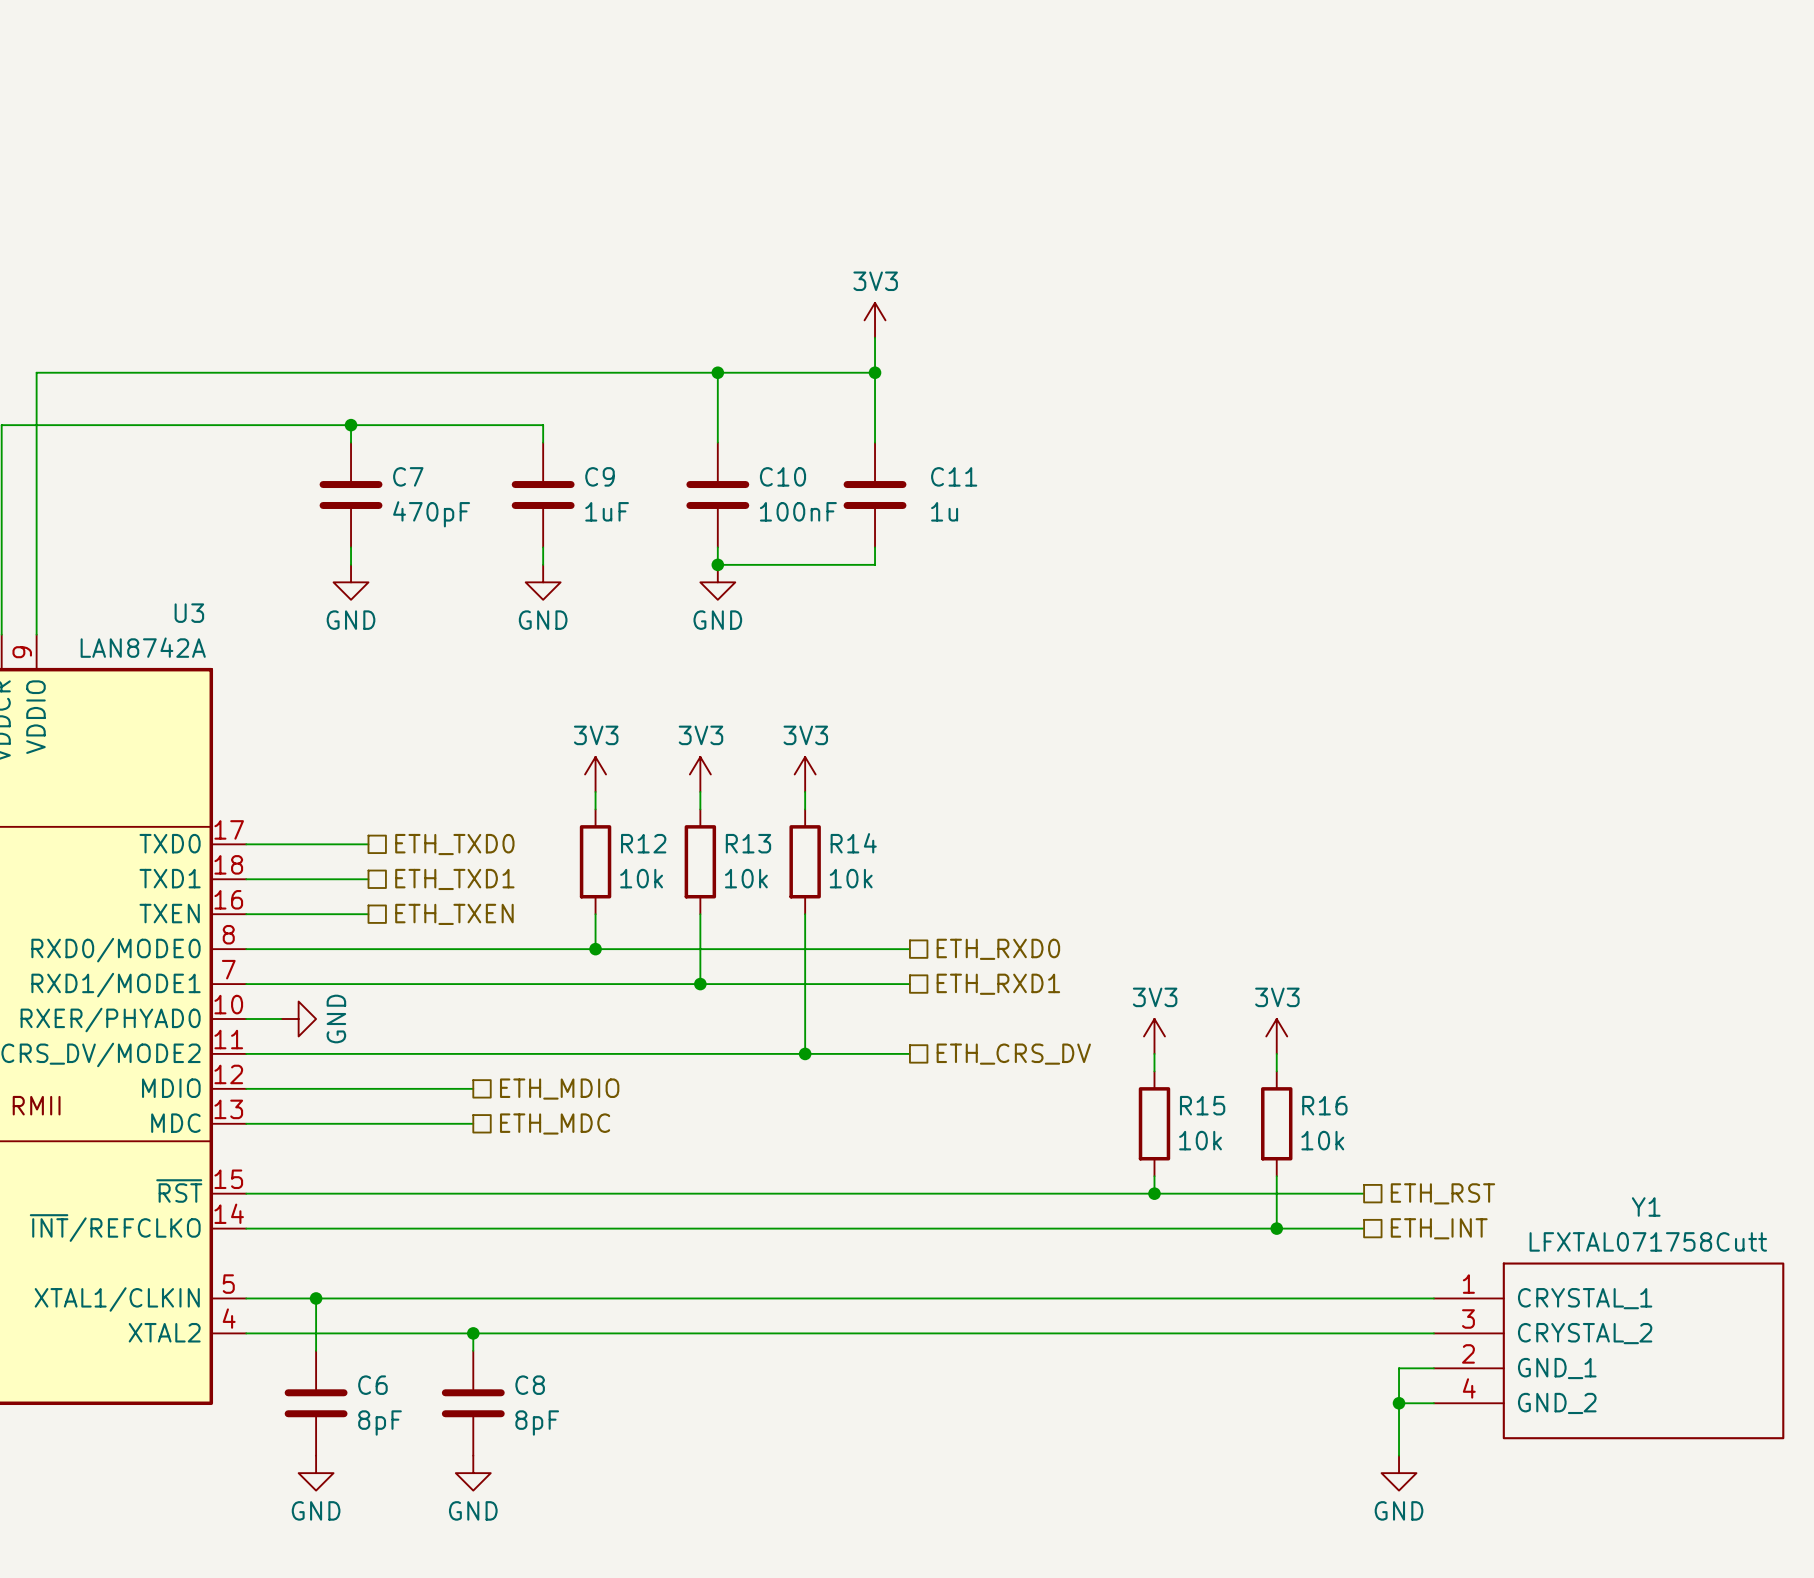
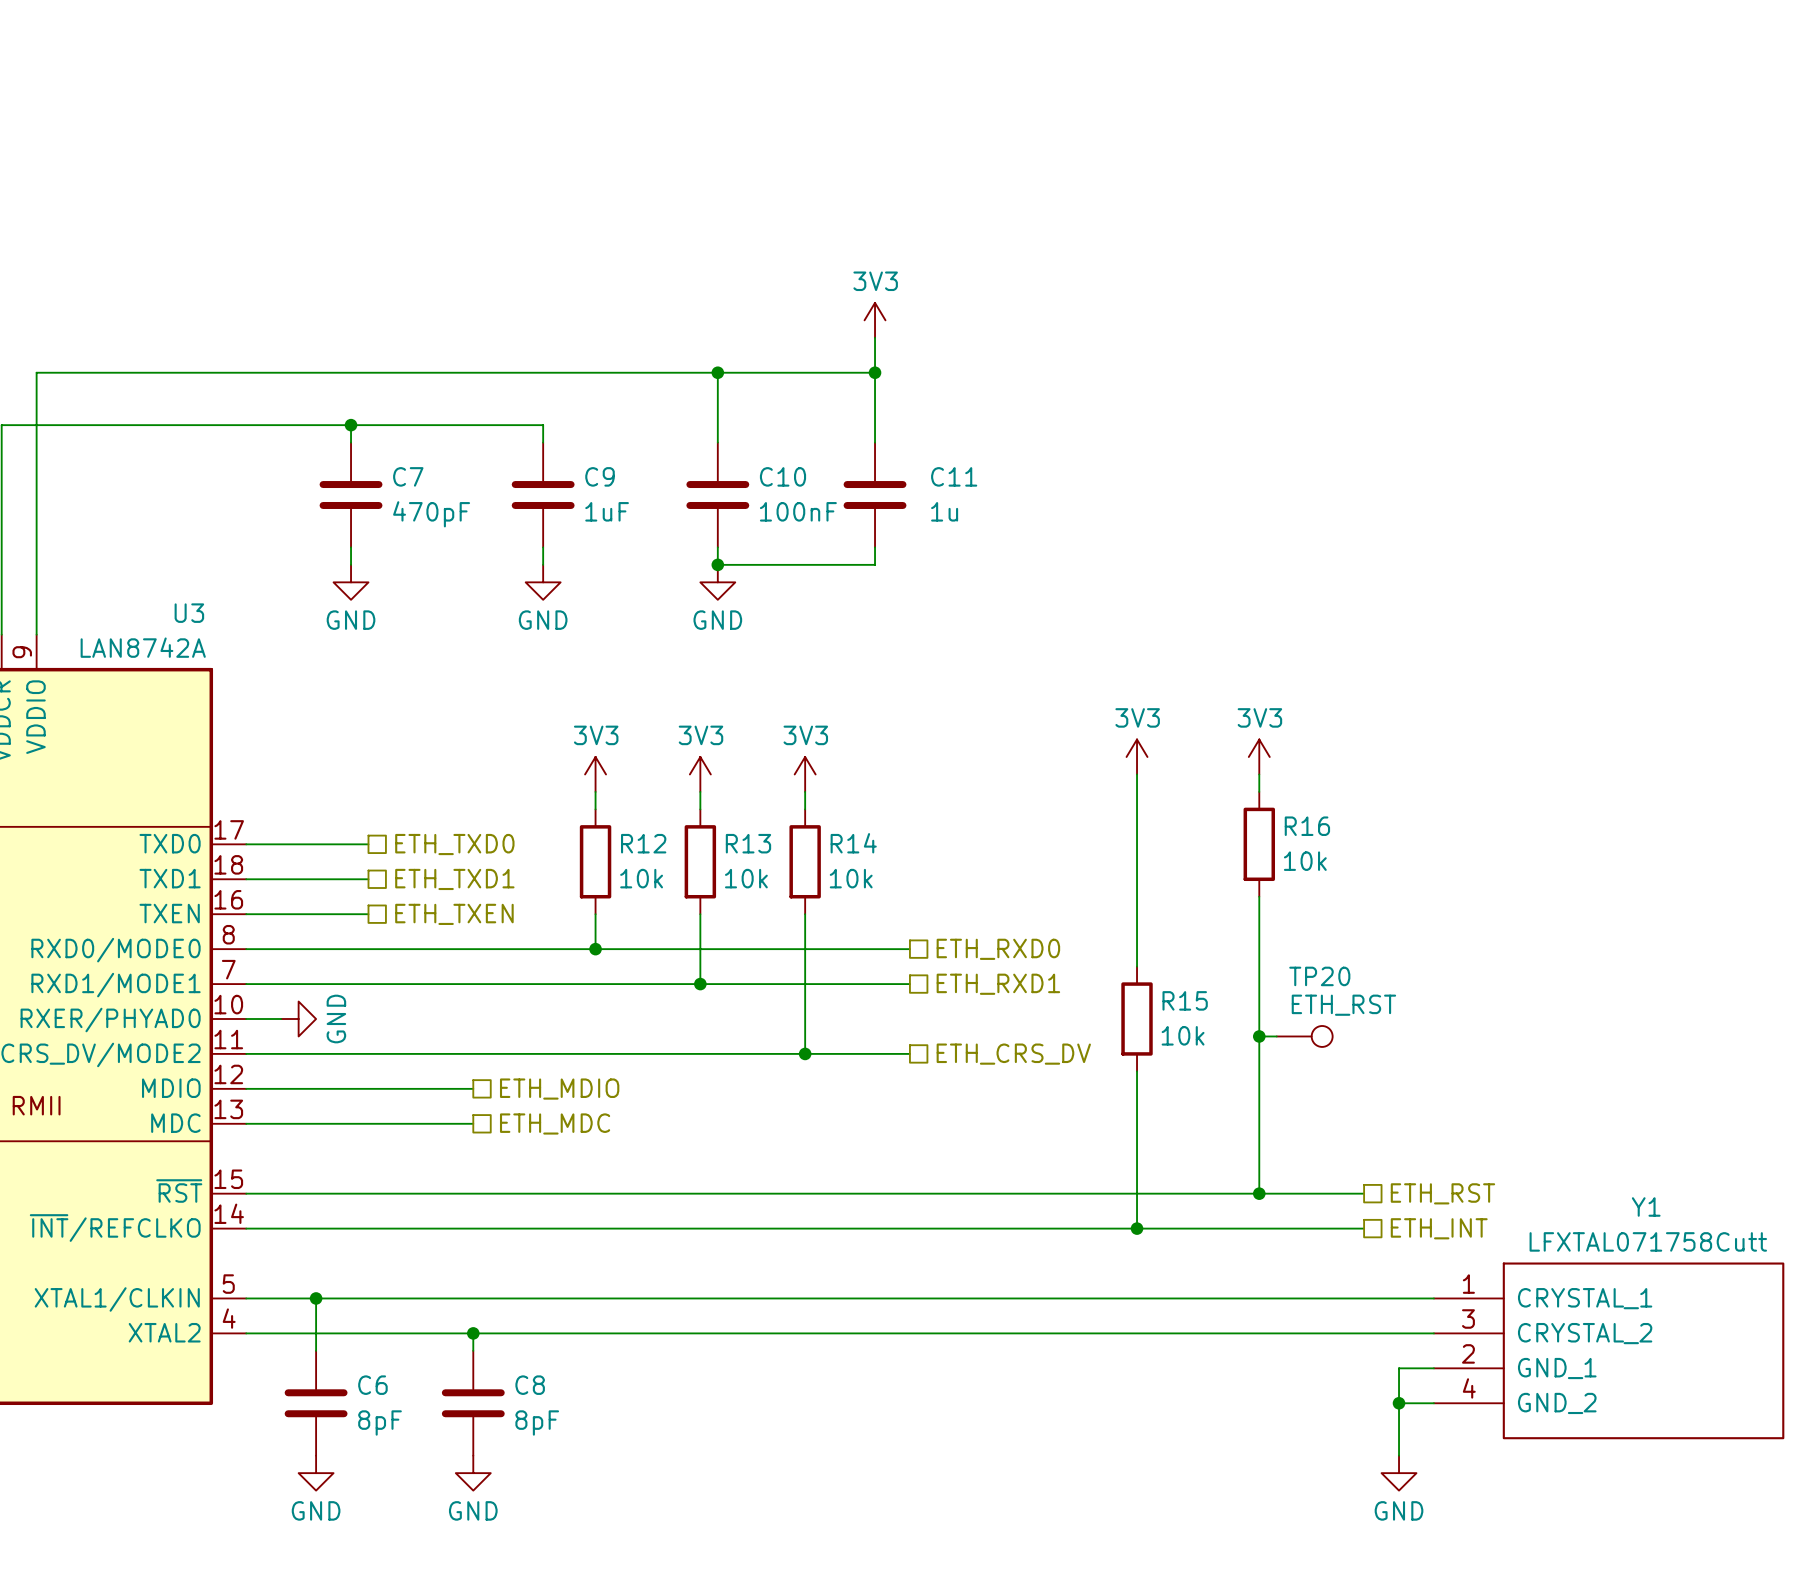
power symbol: none -> 3V3 (1137, 757)
power symbol: none -> 3V3 (1259, 757)
wire: none -> (1137, 774) (1137, 966)
wire: none -> (1259, 896) (1259, 1193)
power symbol: 3V3 (1154, 1036) -> none
wire: none -> (1259, 1036) (1276, 1036)
junction: none -> (1259, 1036)
power symbol: 3V3 (1276, 1036) -> none
TP20: none -> ETH_RST (1304, 1036)
wire: (1154, 1053) (1154, 1071) -> none
wire: (1276, 1053) (1276, 1071) -> (1259, 774) (1259, 791)
wire: none -> (1137, 1071) (1137, 1228)
R15 position: (1154, 1123) -> (1137, 1019)
R16 position: (1276, 1123) -> (1259, 844)
wire: (1154, 1176) (1154, 1193) -> none
wire: (1276, 1176) (1276, 1228) -> none
junction position: (1154, 1193) -> (1137, 1228)
junction position: (1276, 1228) -> (1259, 1193)

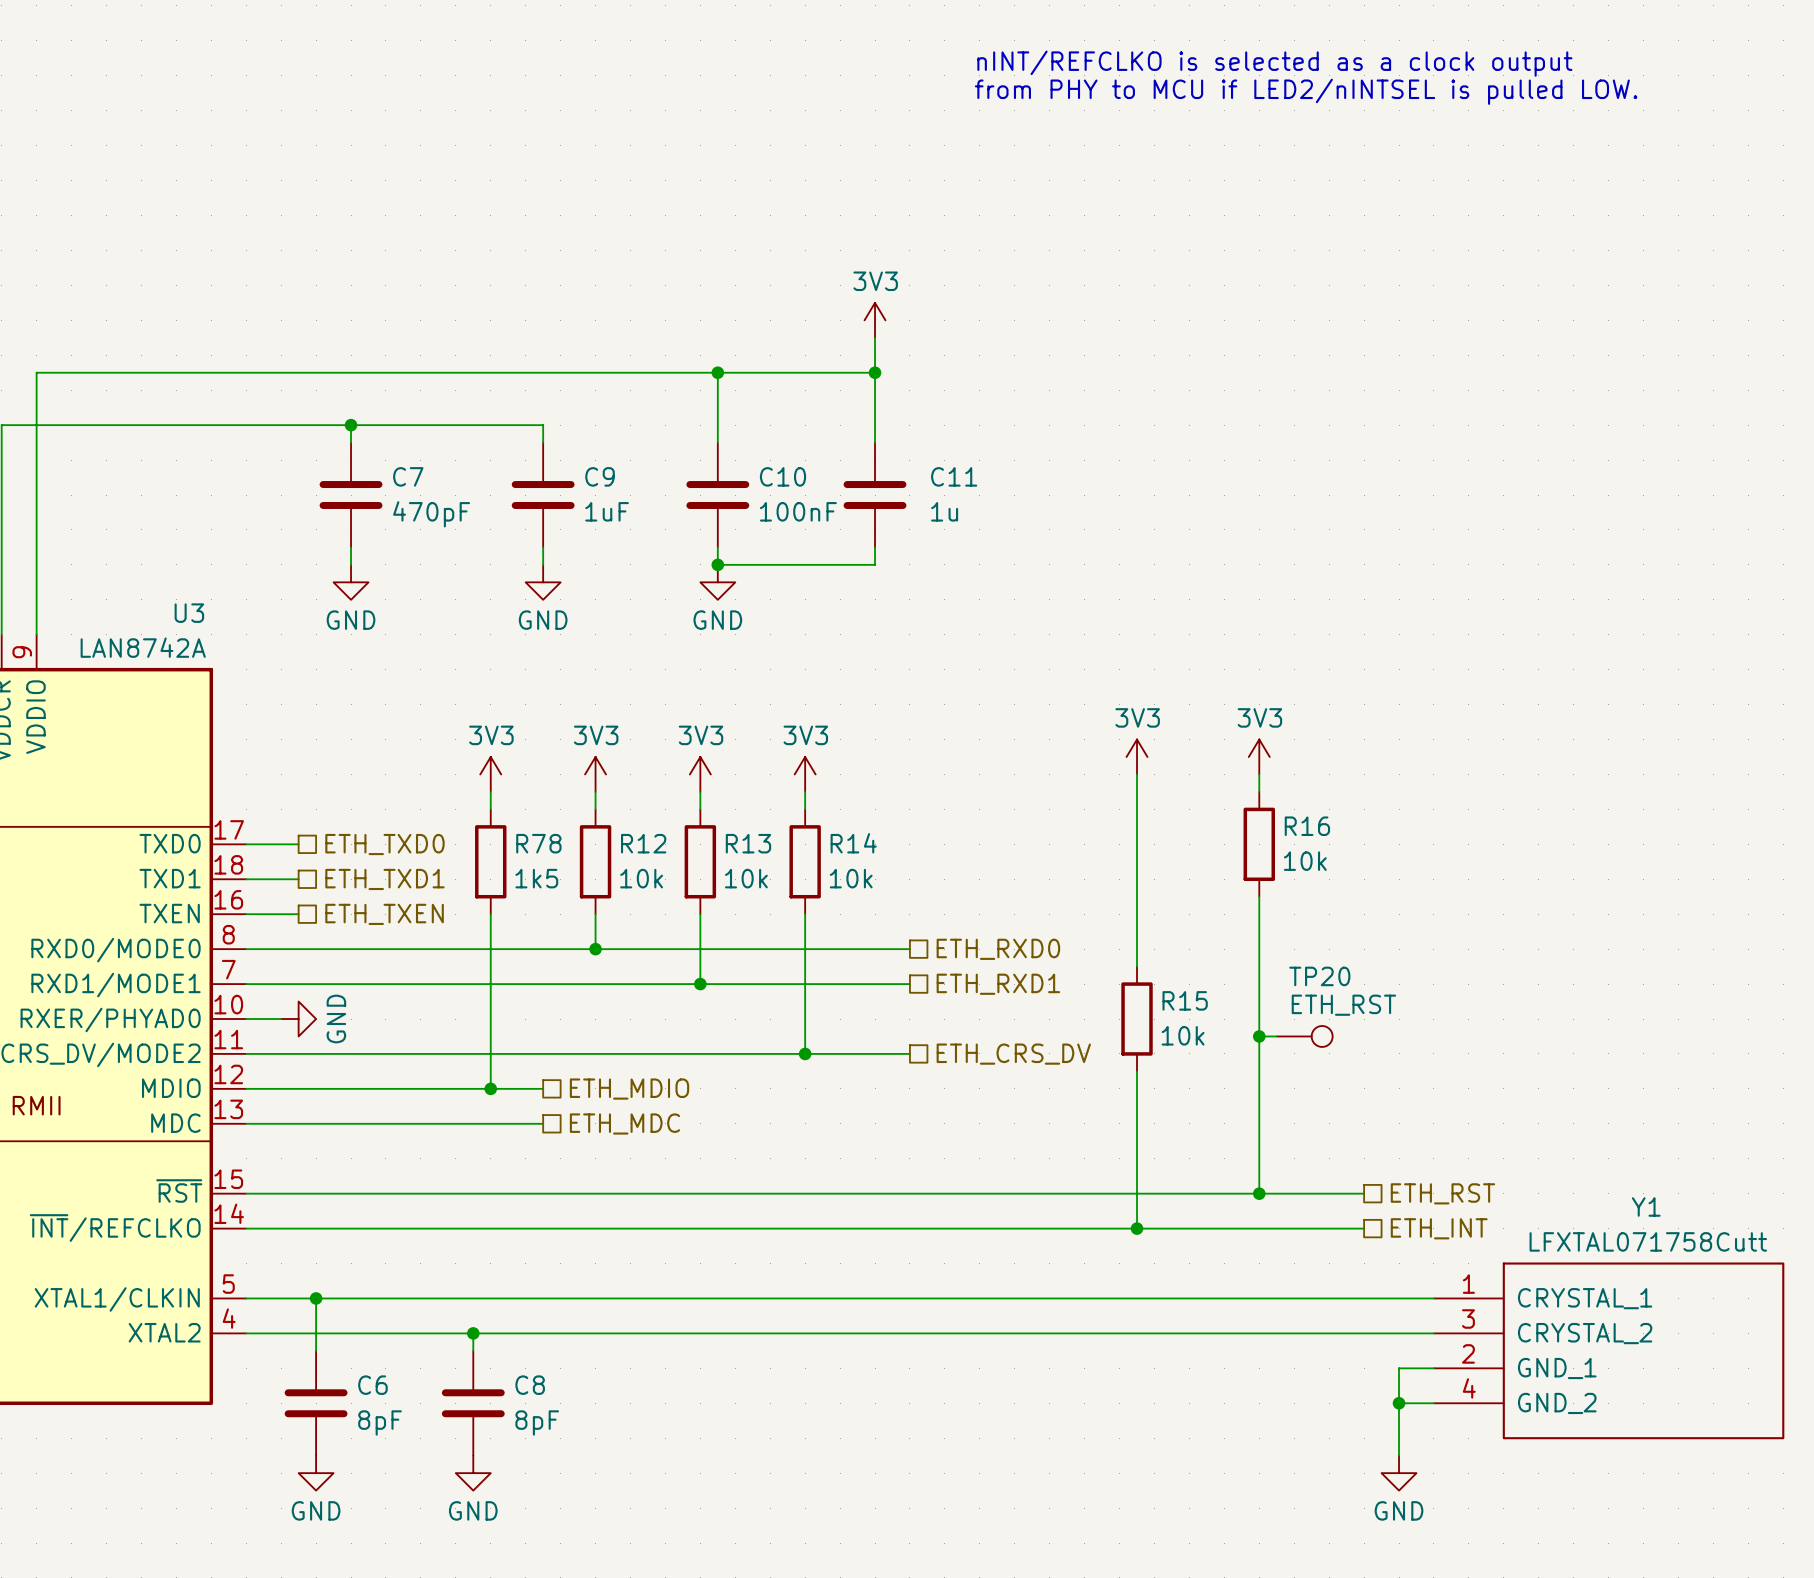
text: none -> nINT/REFCLKO is selected as a clock output (1274, 63)
text: none -> from PHY to MCU if LED2/nINTSEL is pulled LOW. (1306, 91)
power symbol: none -> 3V3 (490, 774)
wire: none -> (490, 791) (490, 809)
wire: (298, 844) (368, 844) -> none
hierarchical label position: ETH_TXD0 (454, 844) -> ETH_TXD0 (384, 844)
R78: none -> 1k5 (490, 861)
wire: (298, 879) (368, 879) -> (473, 1088) (543, 1088)
hierarchical label position: ETH_TXD1 (454, 879) -> ETH_TXD1 (384, 879)
wire: (298, 914) (368, 914) -> (473, 1123) (543, 1123)
hierarchical label position: ETH_TXEN (454, 914) -> ETH_TXEN (384, 914)
wire: none -> (490, 914) (490, 1088)
junction: none -> (490, 1088)
hierarchical label position: ETH_MDIO (559, 1089) -> ETH_MDIO (629, 1089)
hierarchical label position: ETH_MDC (555, 1123) -> ETH_MDC (624, 1123)

